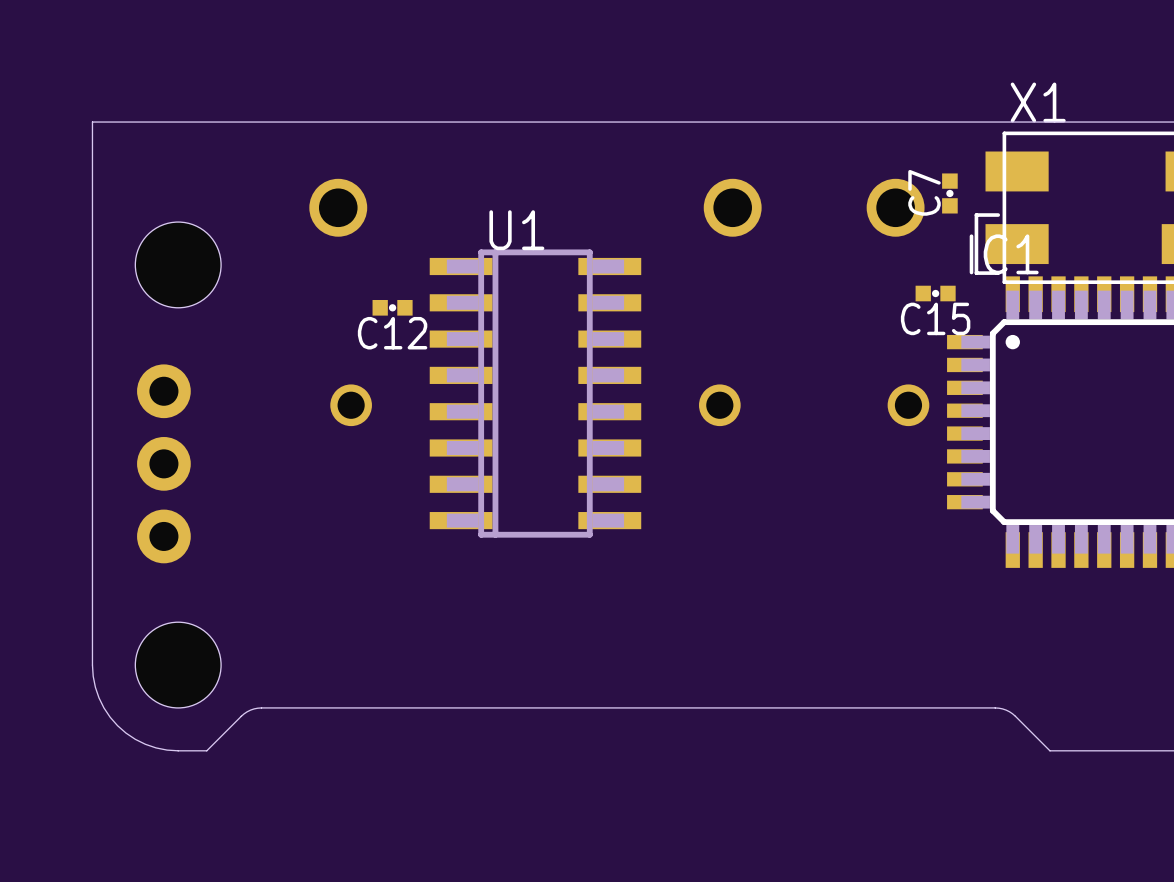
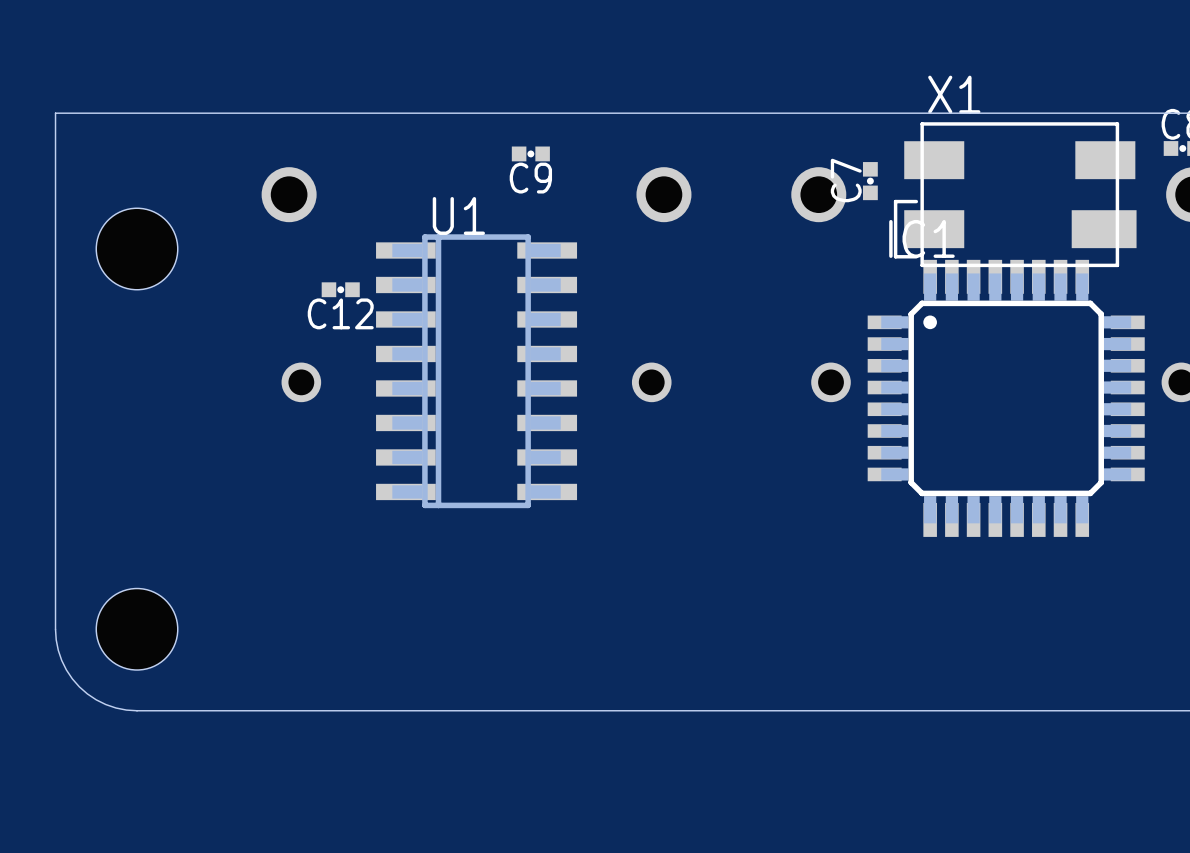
C9: none -> (530, 153)
C15: (935, 293) -> none
part: (163, 463) -> none
board edge: (1049, 750) (1012, 713) (995, 707) (261, 707) (244, 713) (206, 750) -> (965, 710) (164, 710)

